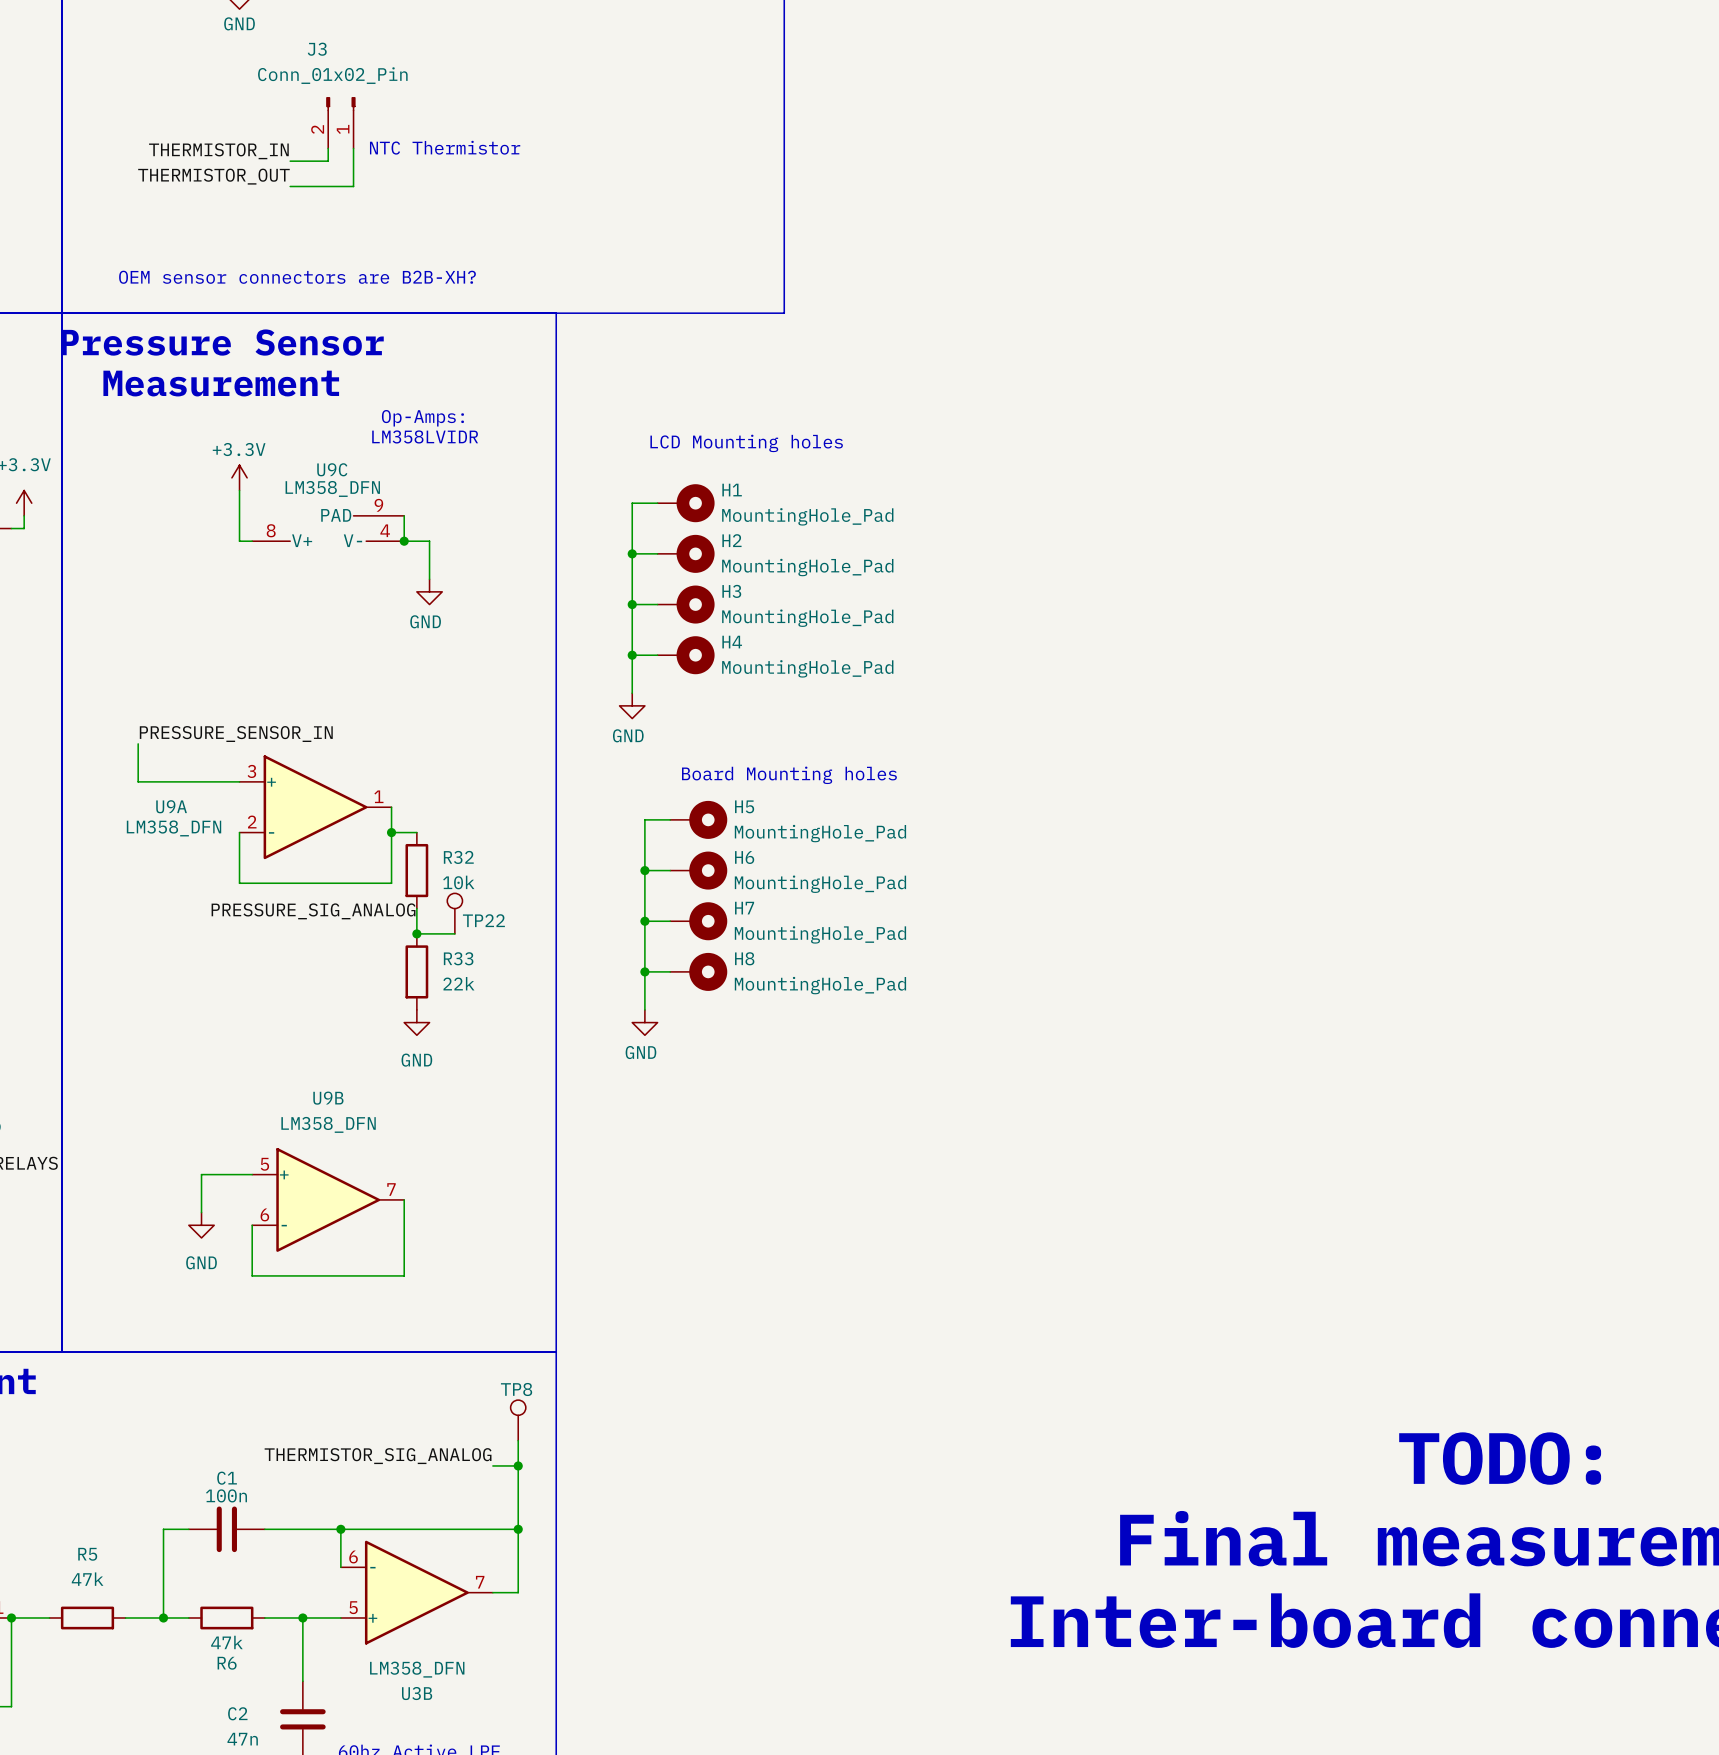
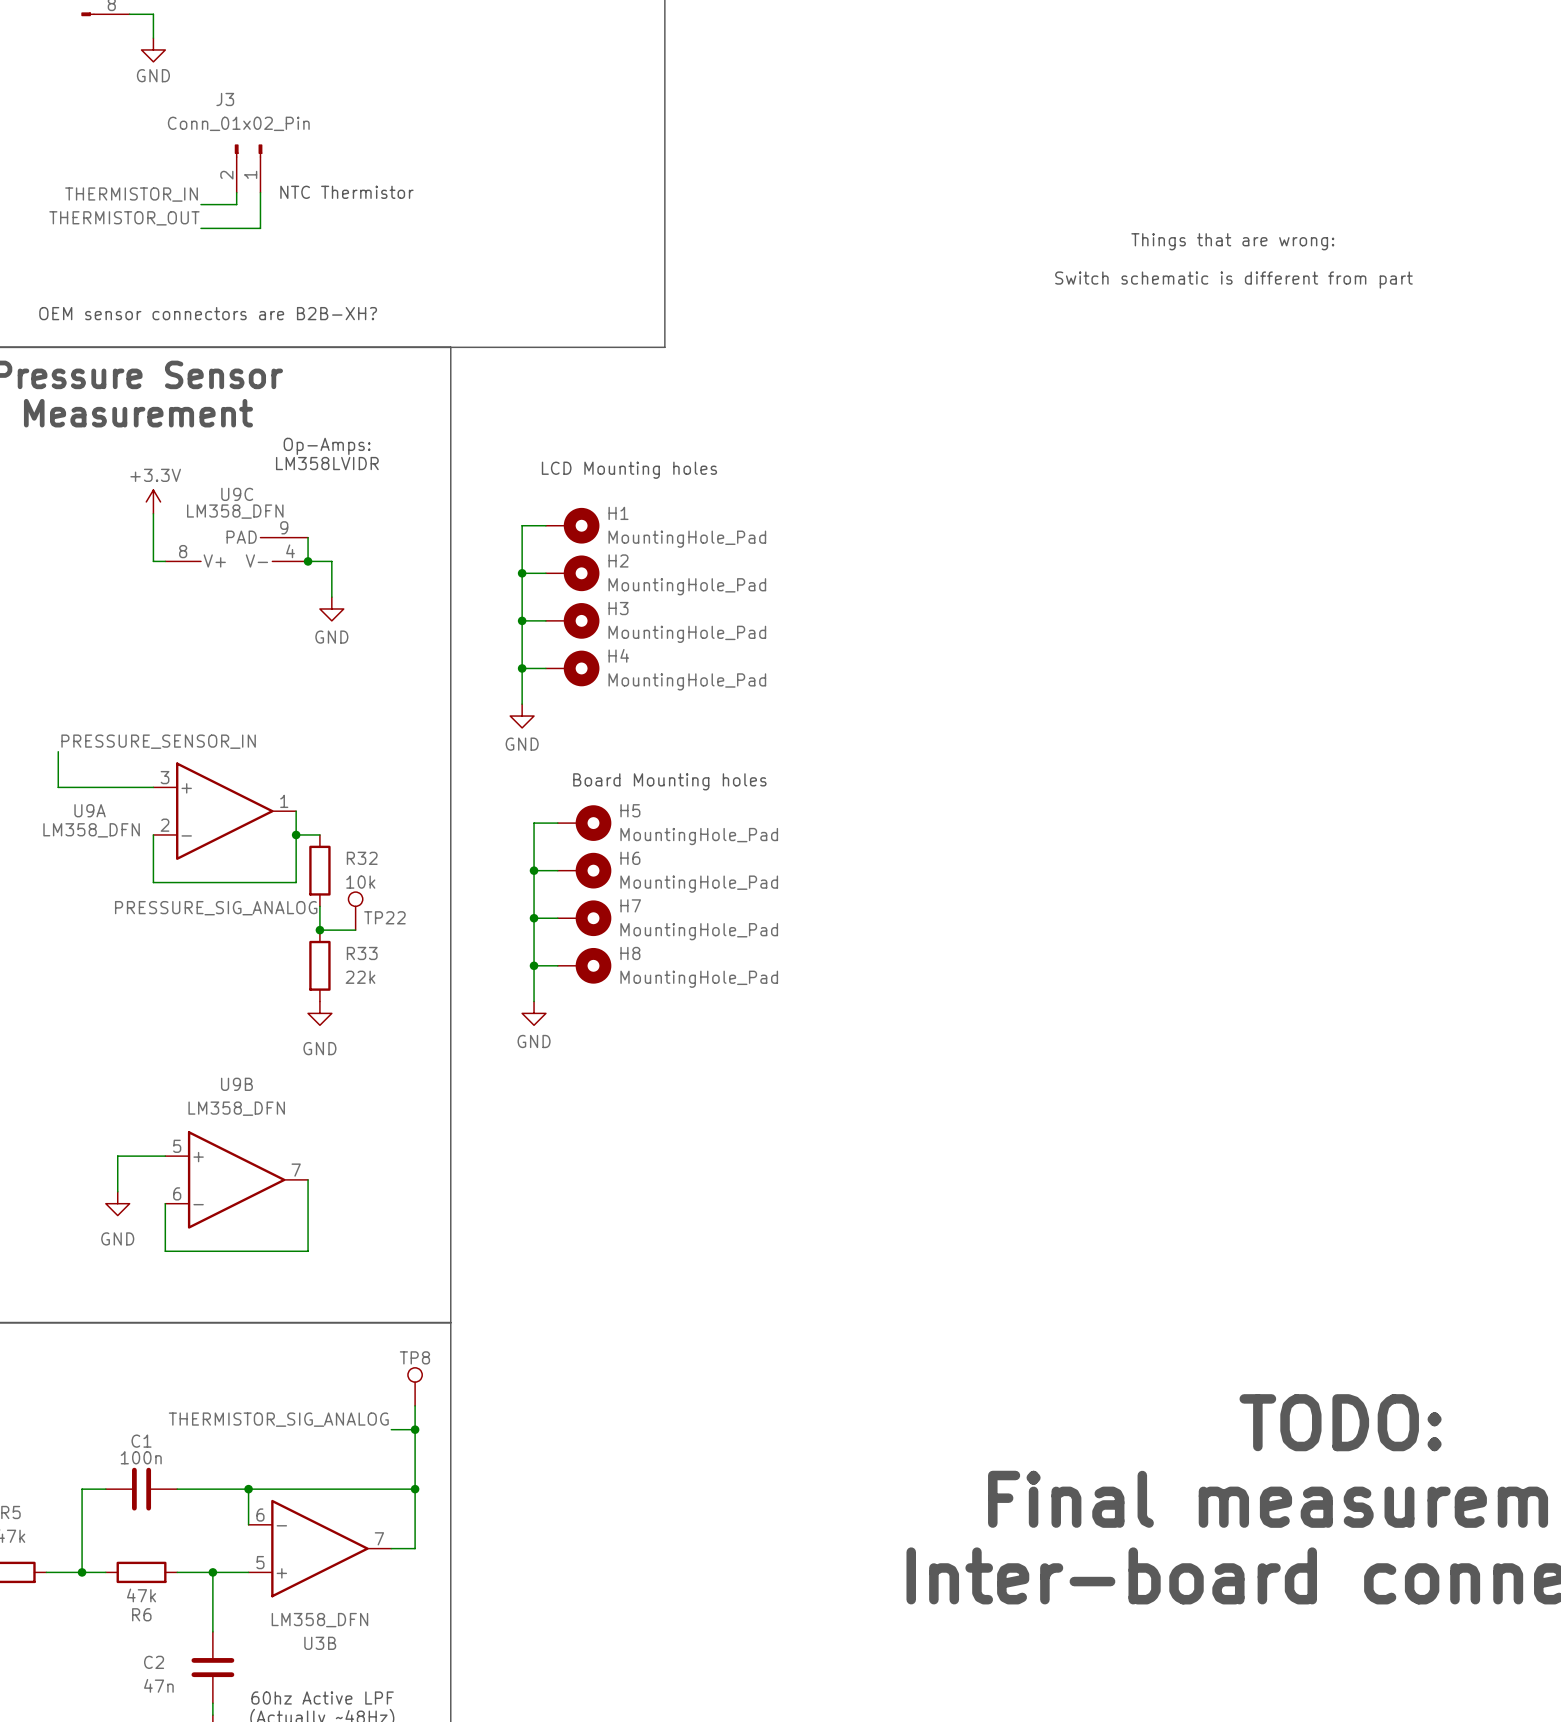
text: none -> Things that are wrong: (1232, 241)
text: none -> Switch schematic is different from part (1233, 280)

